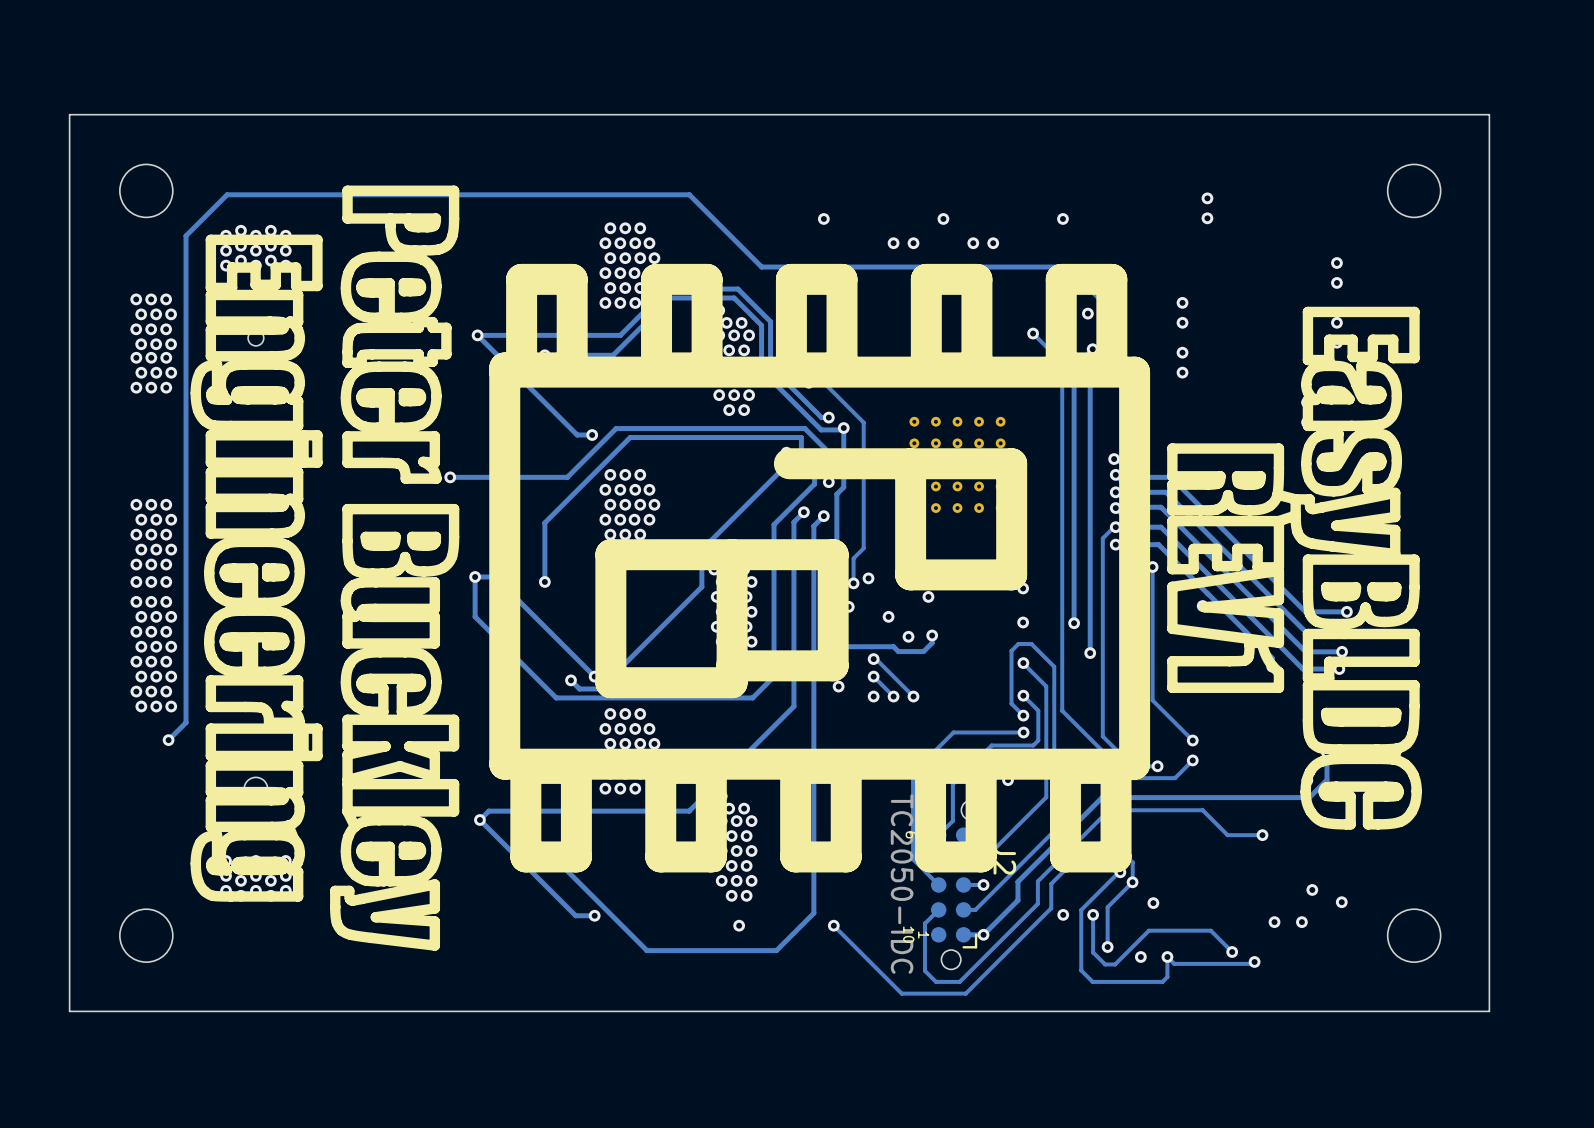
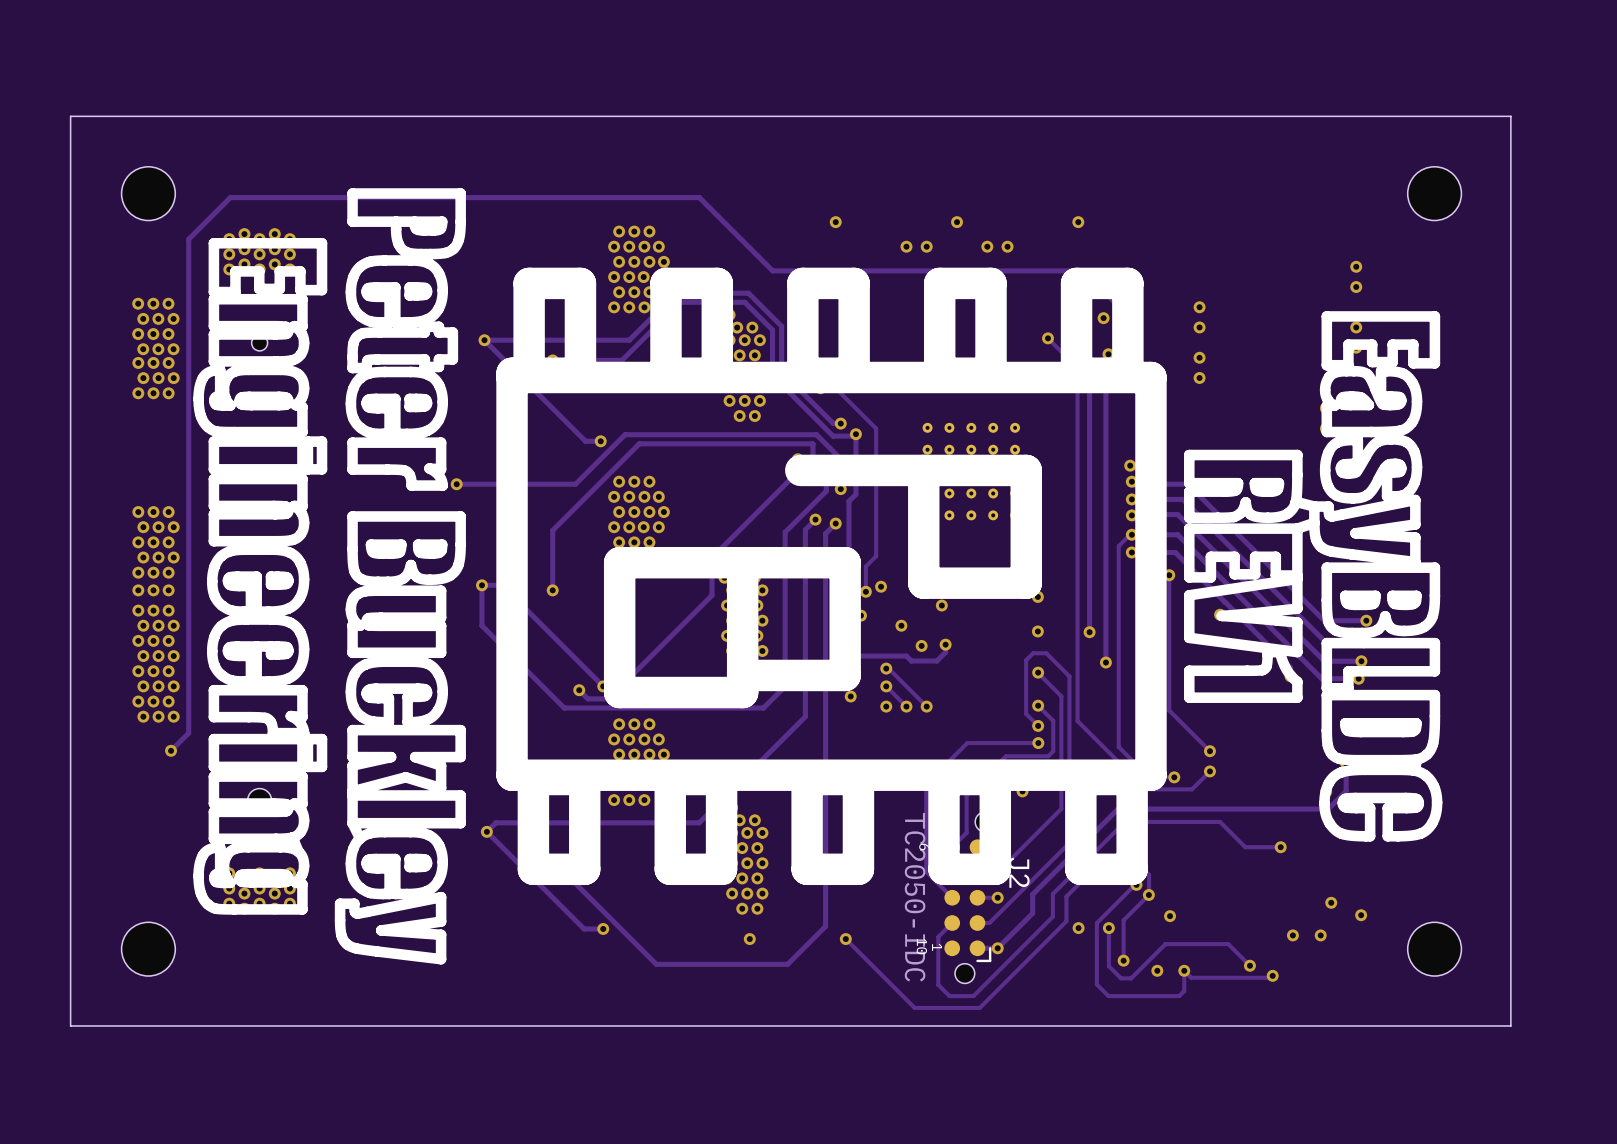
via: (1207, 198) -> none
via: (1207, 218) -> none

